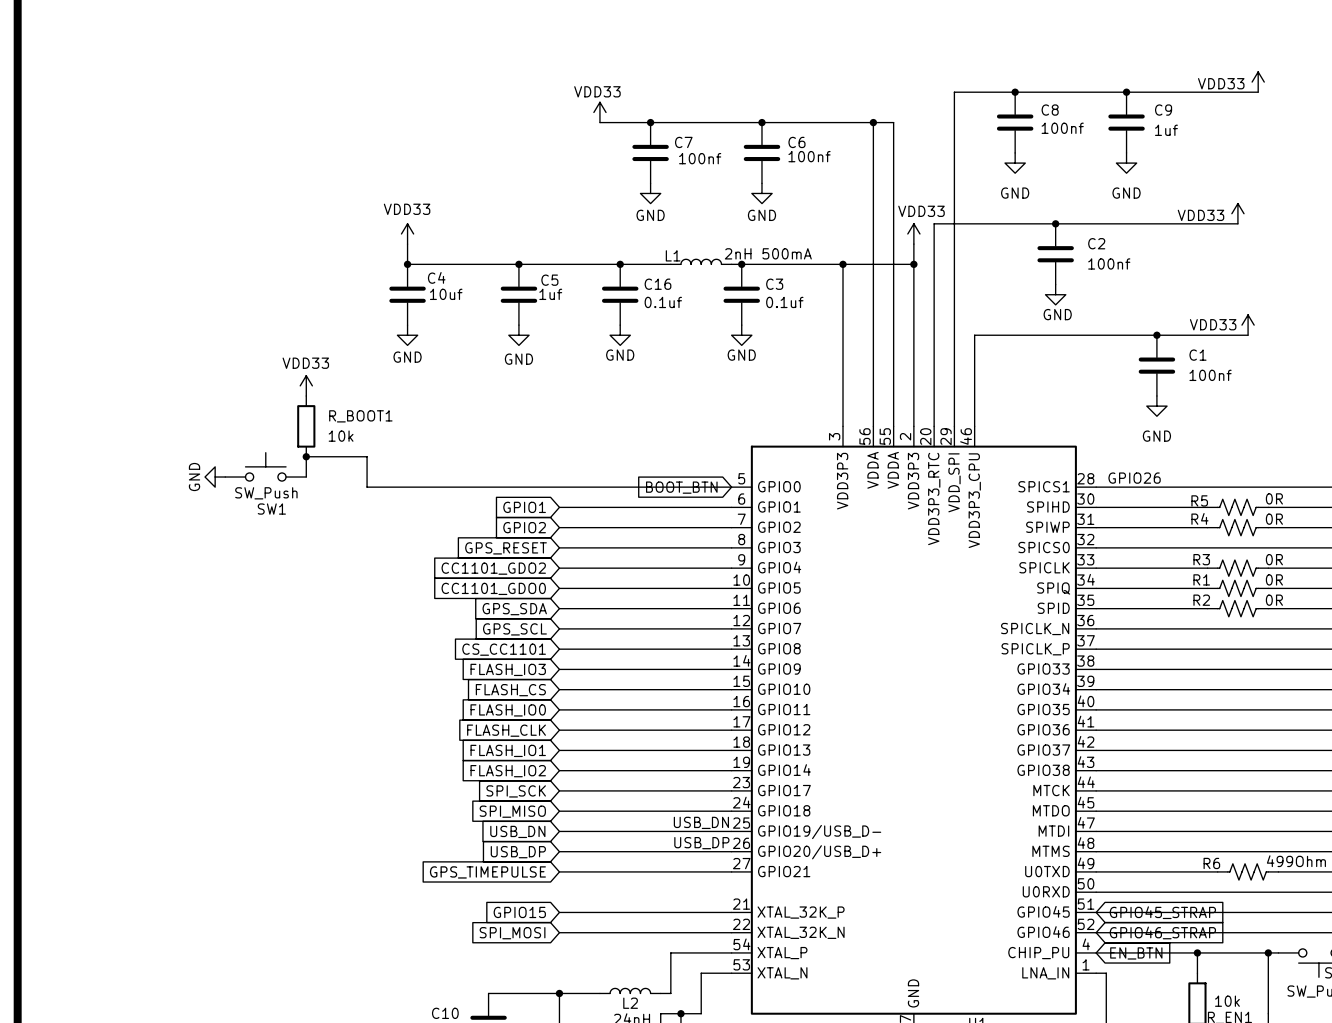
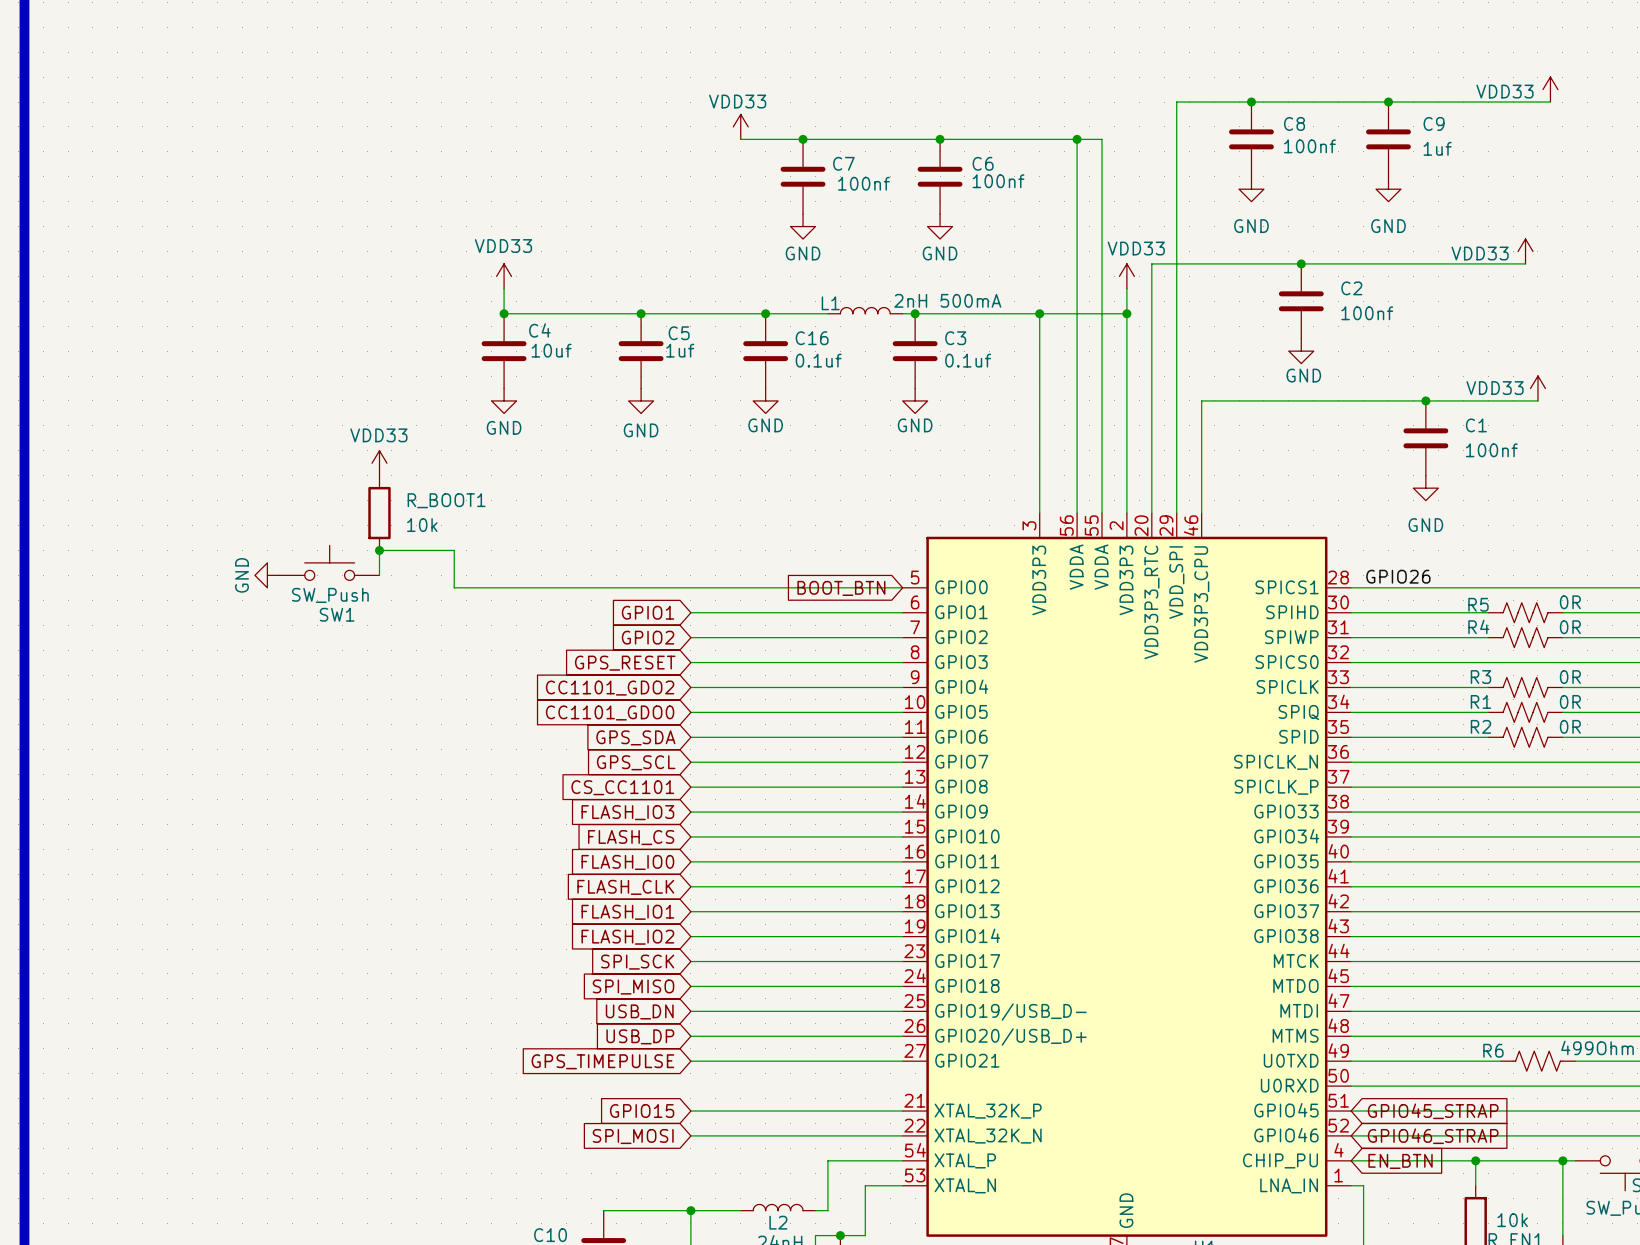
label: USB_DN (701, 822) -> none
label: USB_DP (701, 843) -> none

